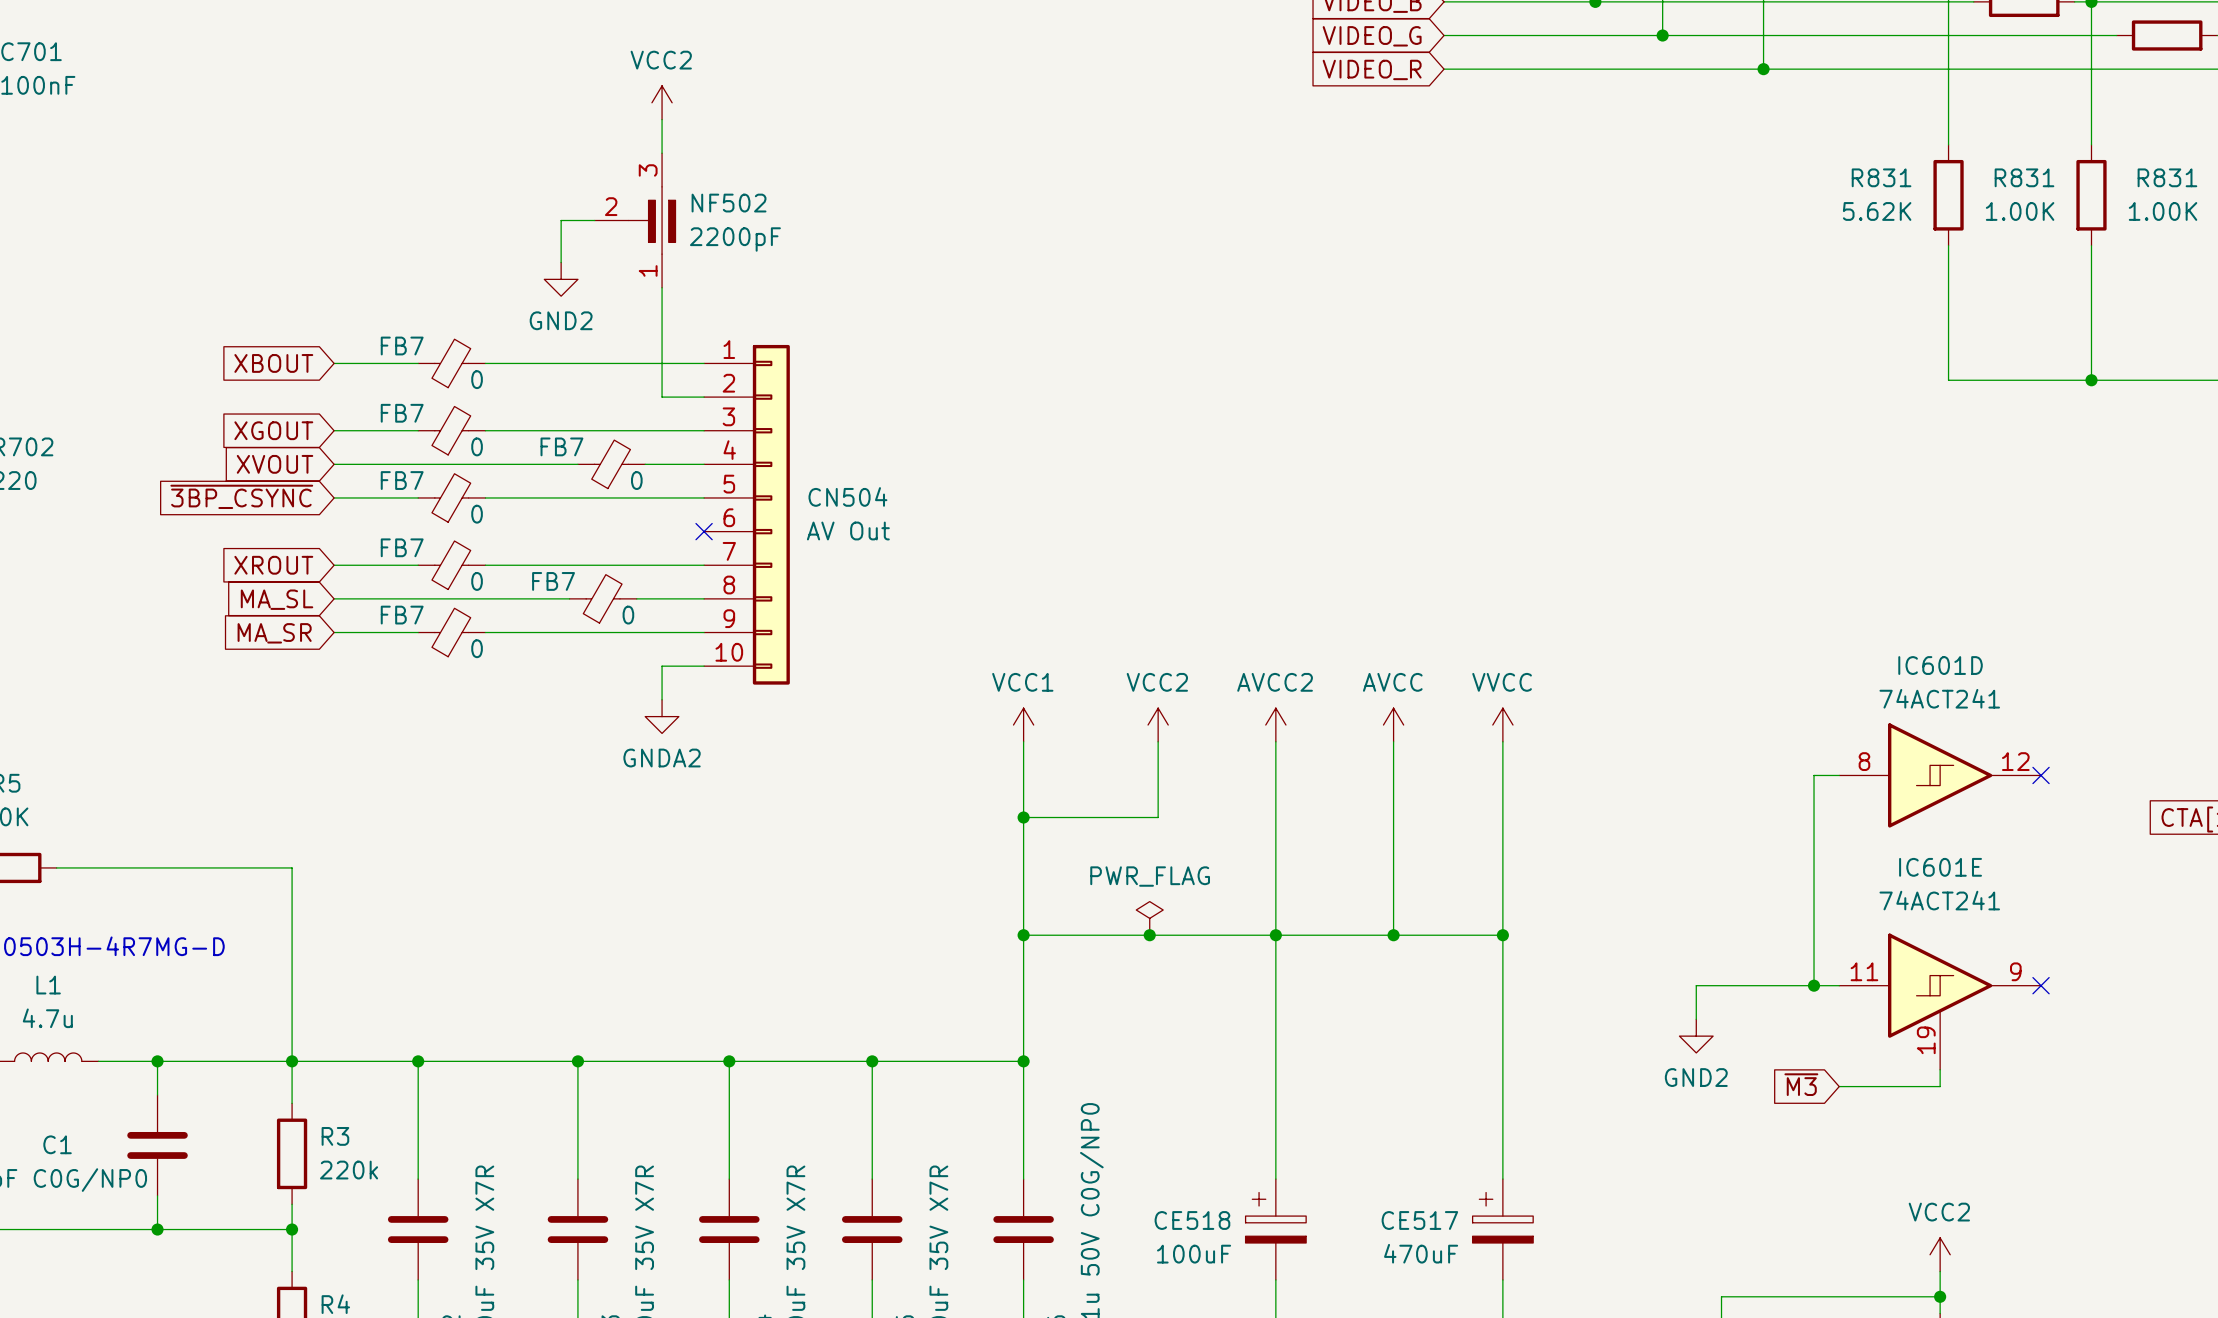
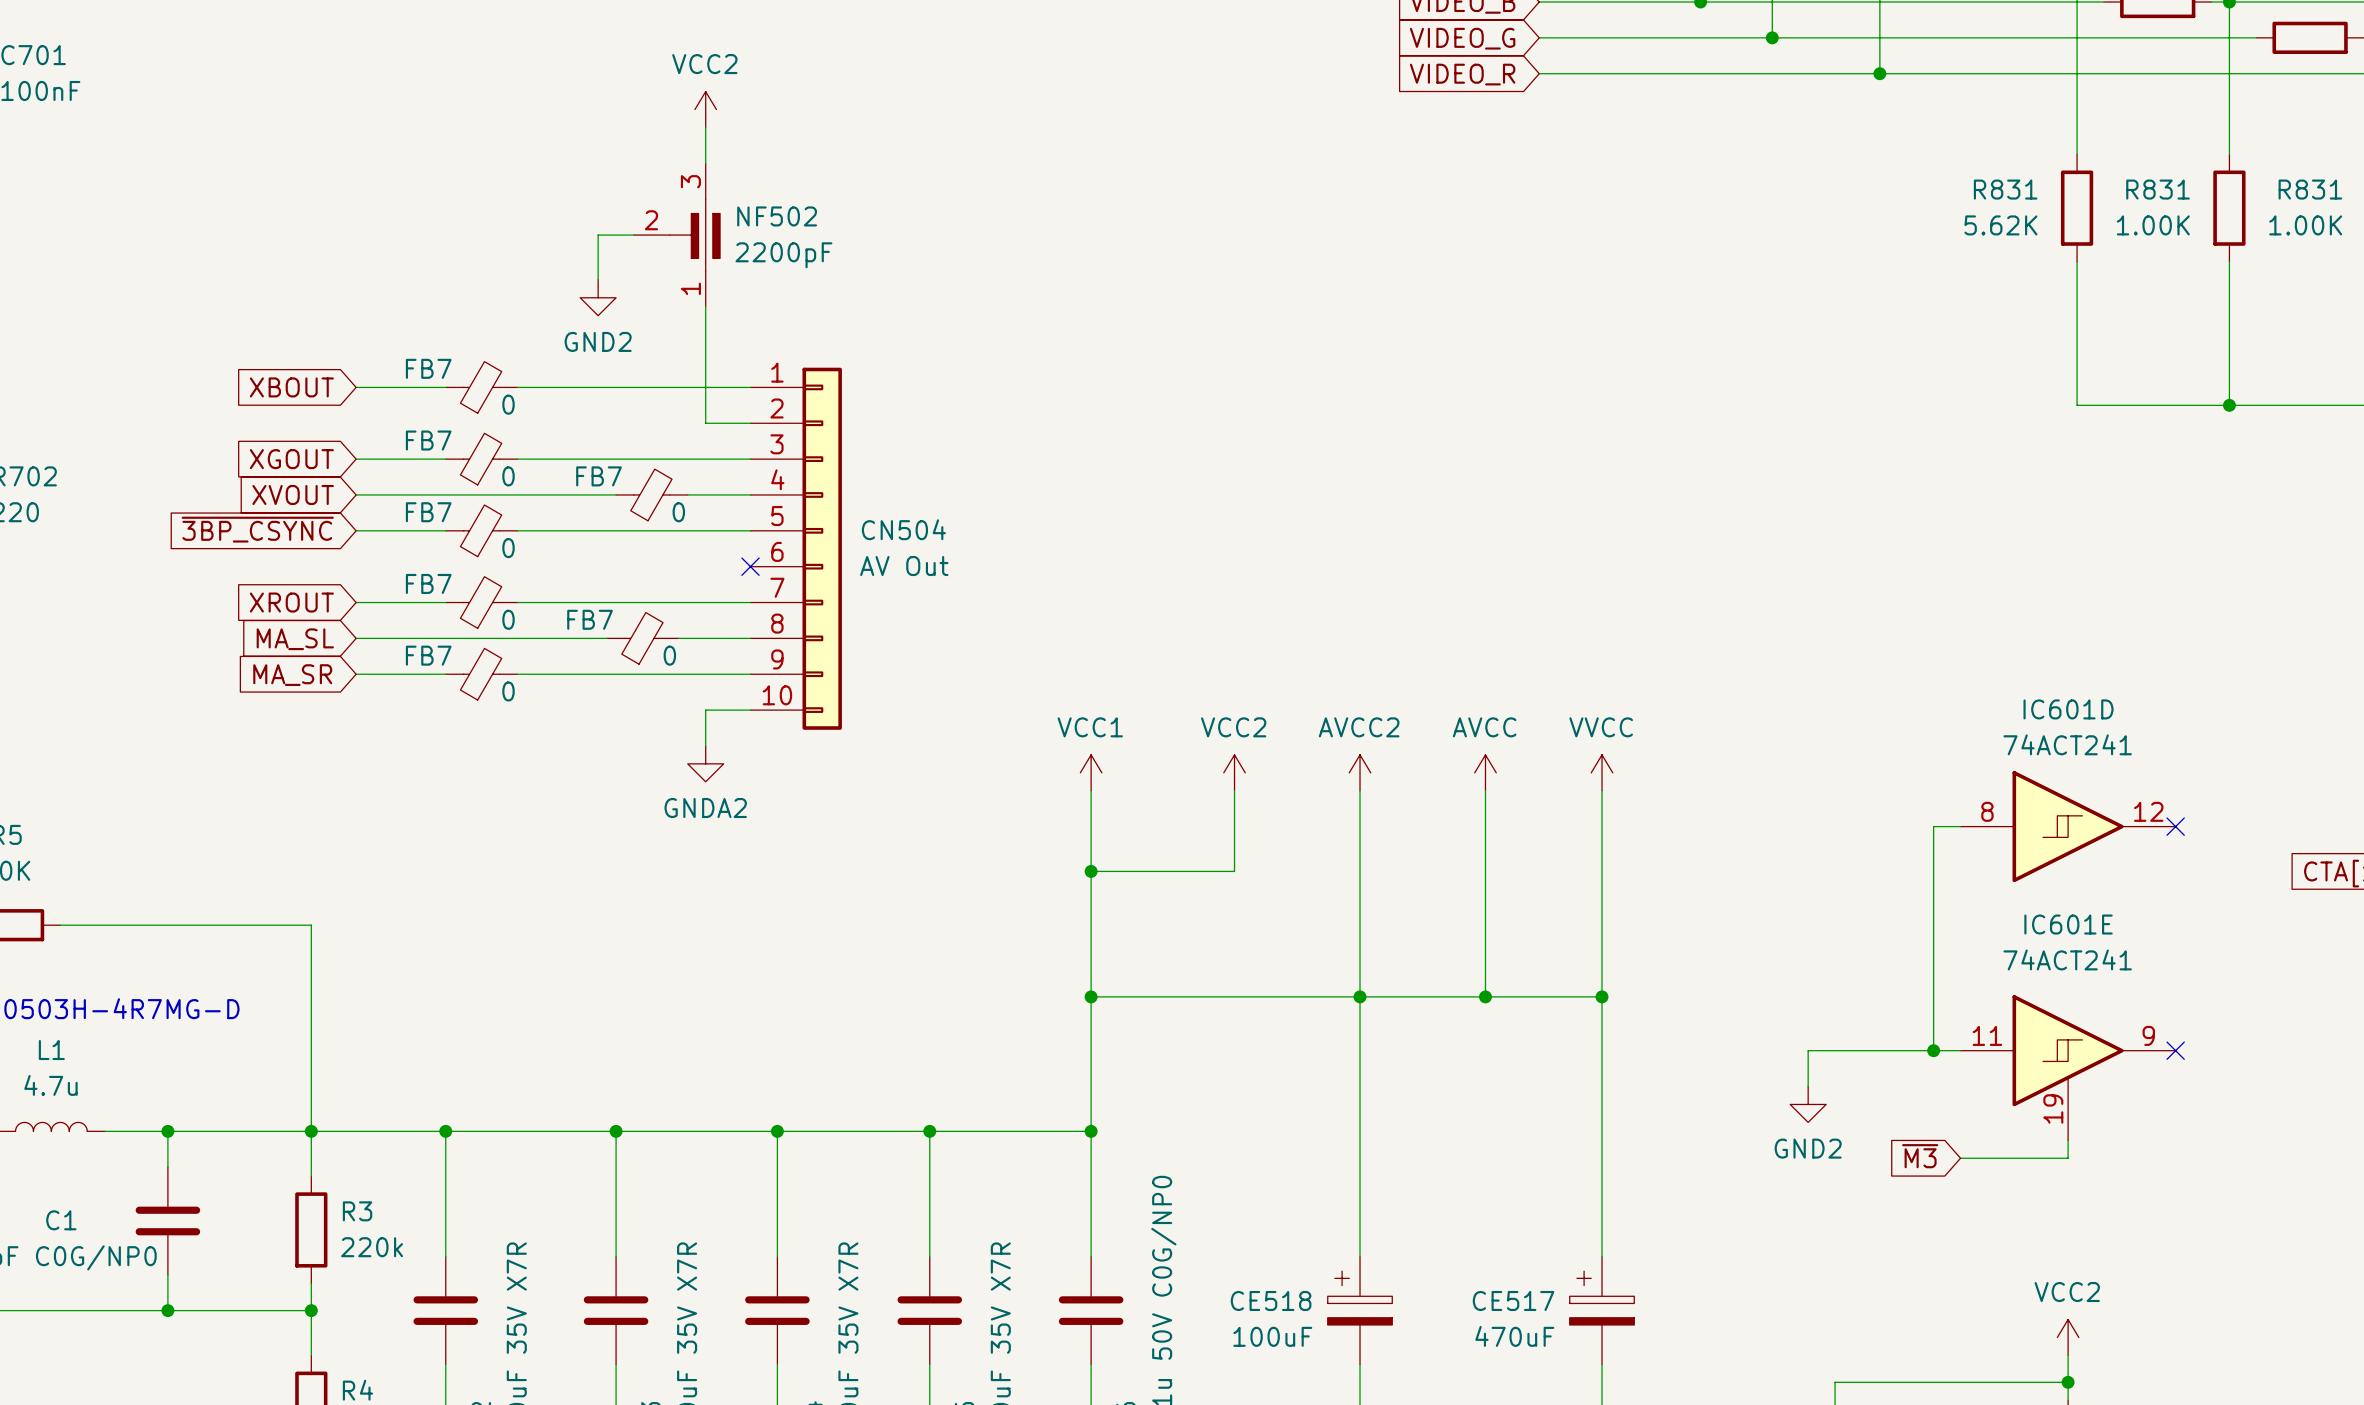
power symbol: PWR_FLAG (1149, 918) -> none
junction: (1149, 935) -> none

